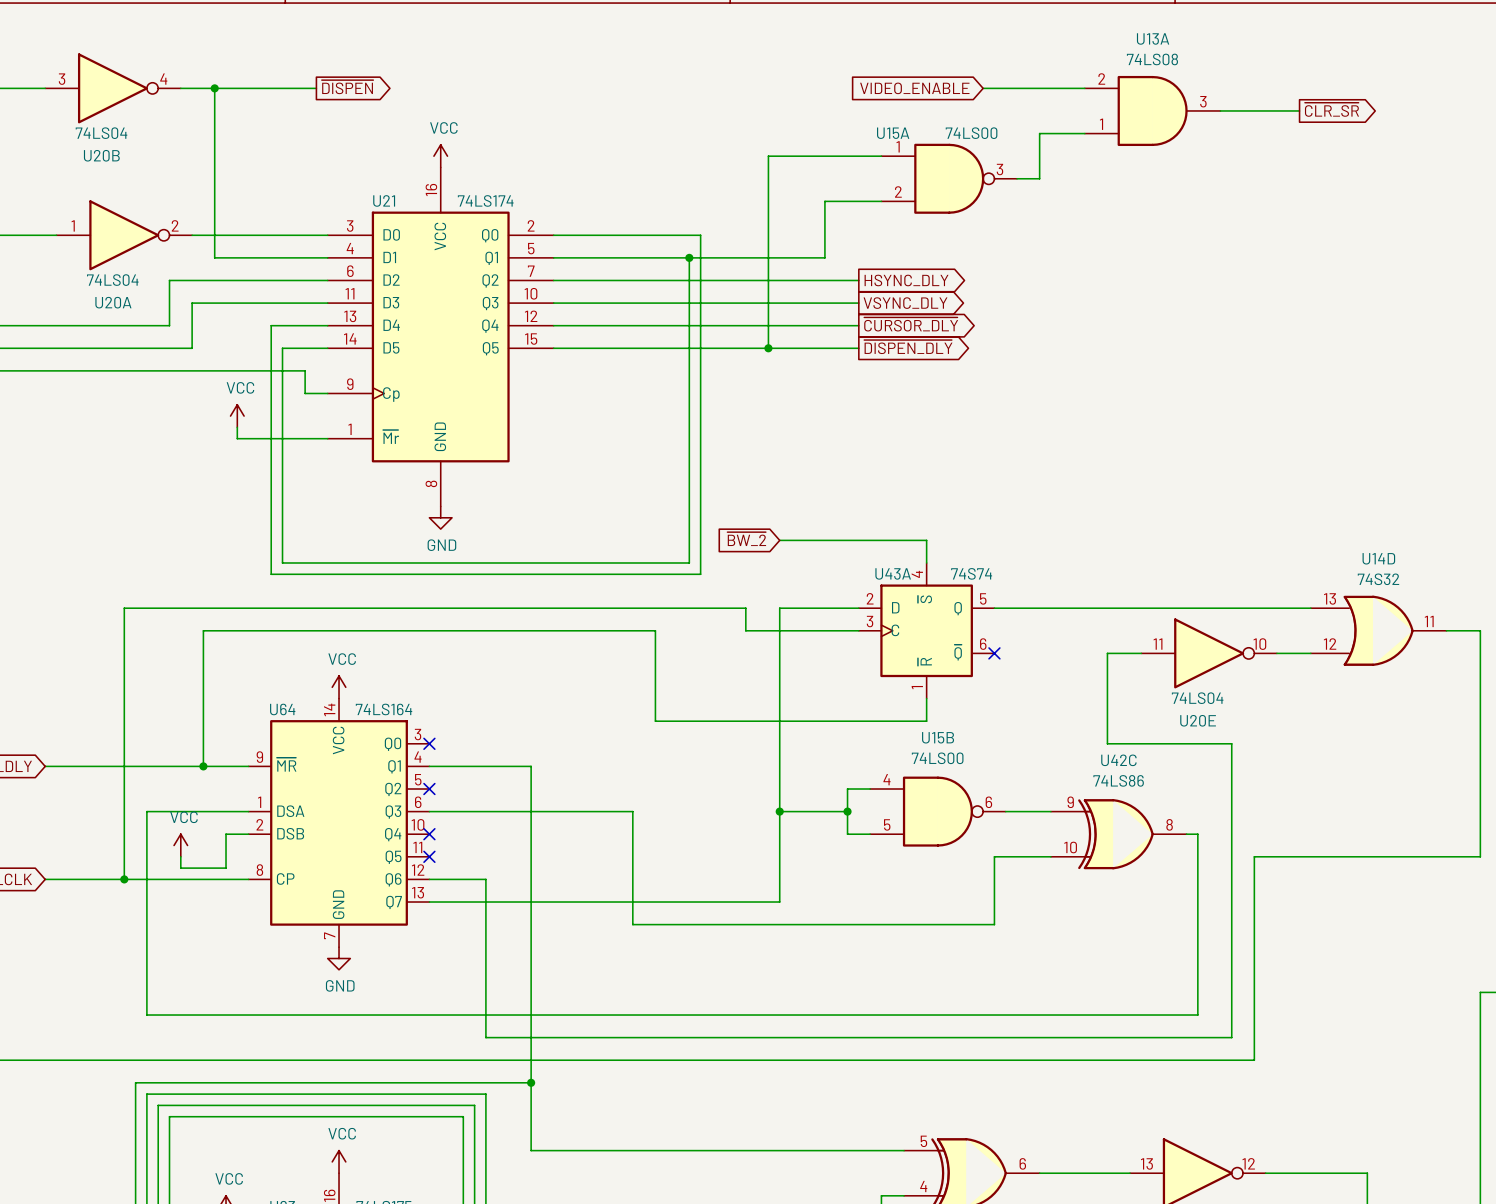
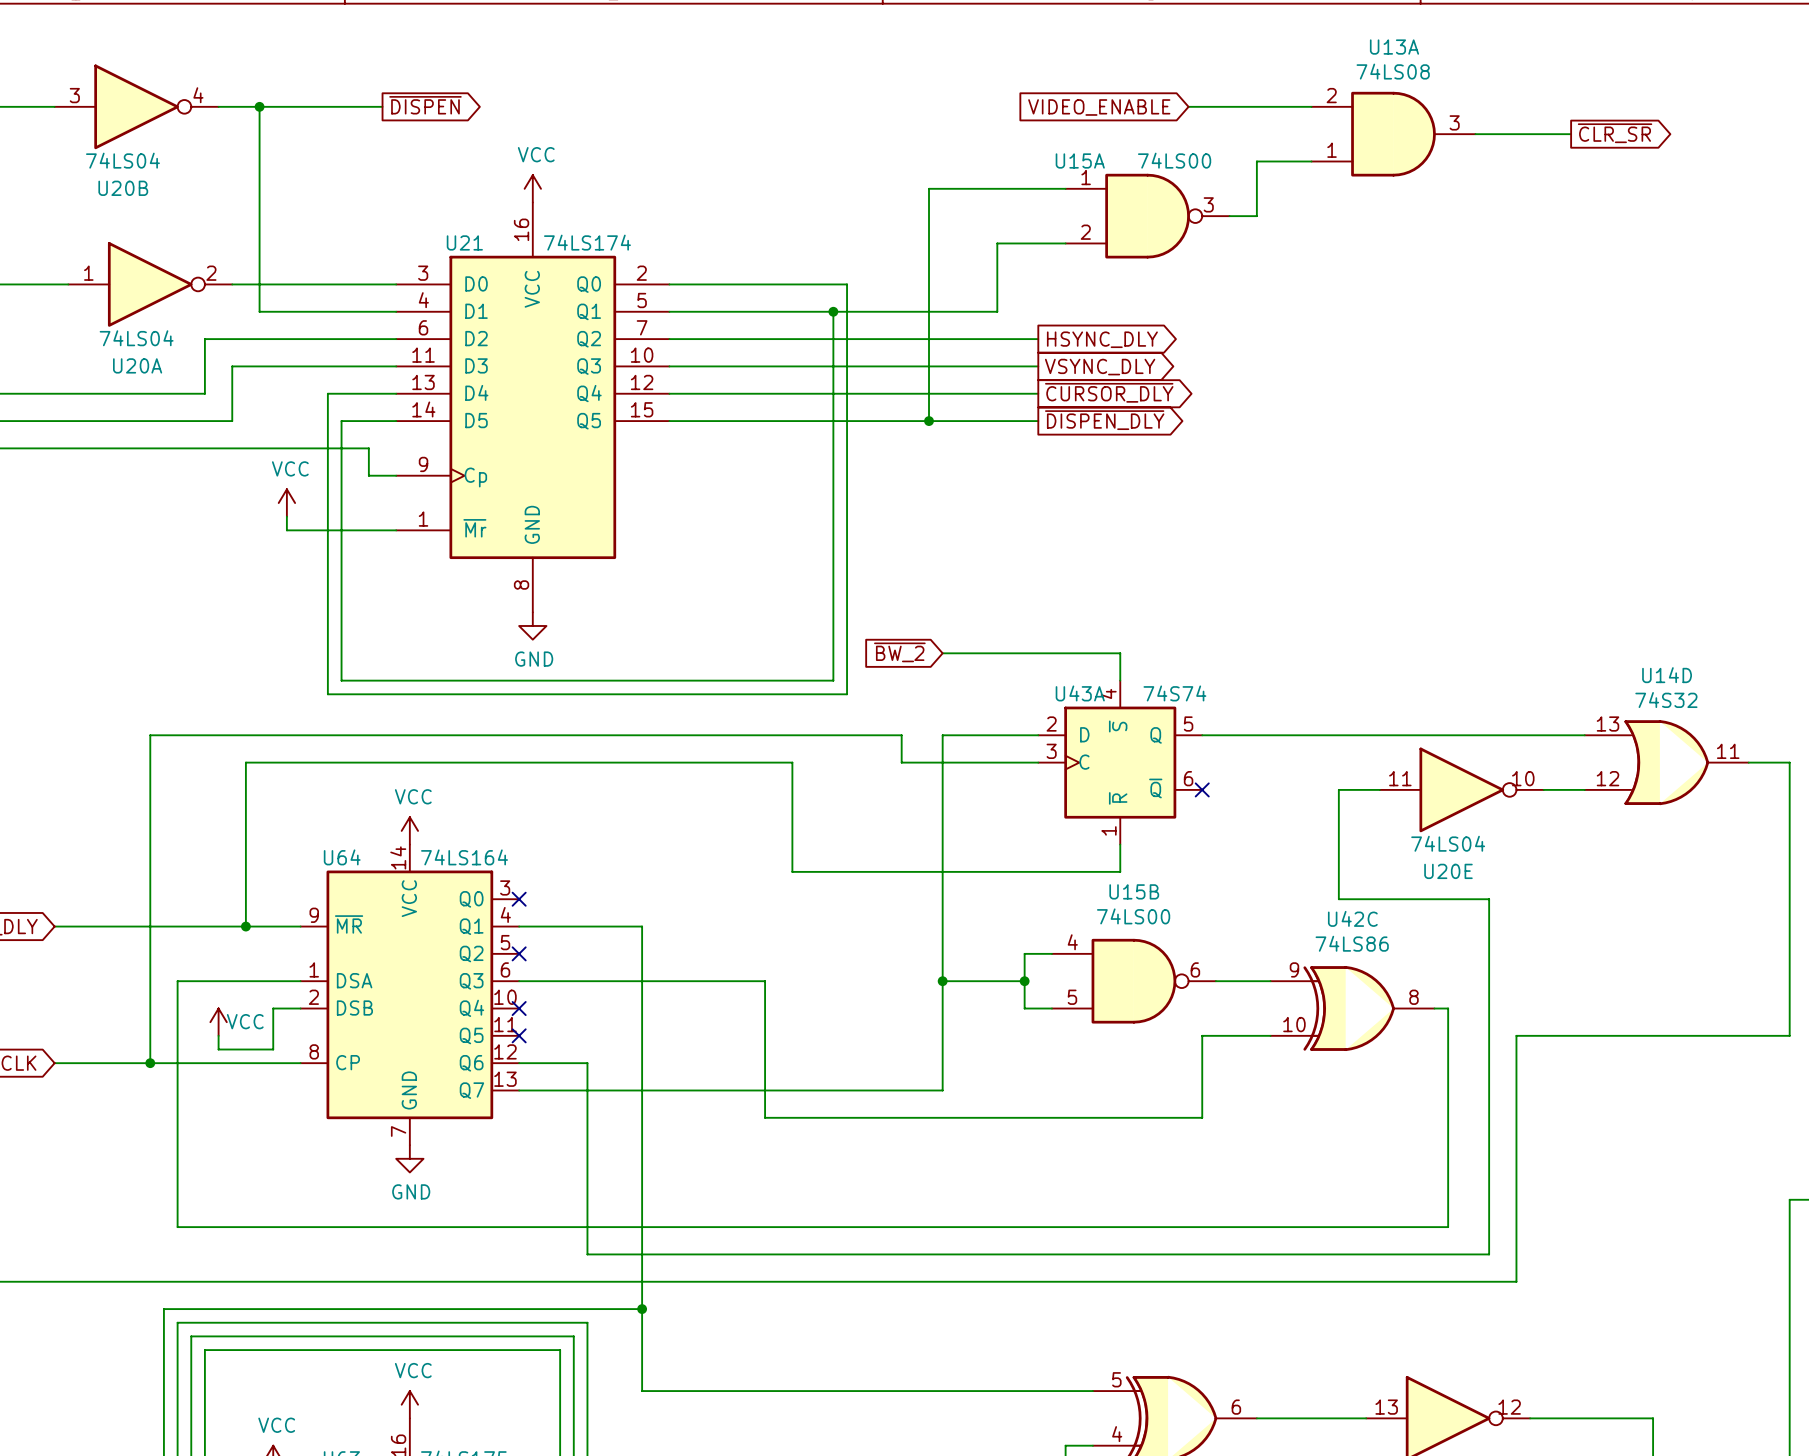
power symbol text position: VCC (183, 817) -> VCC (245, 1021)

